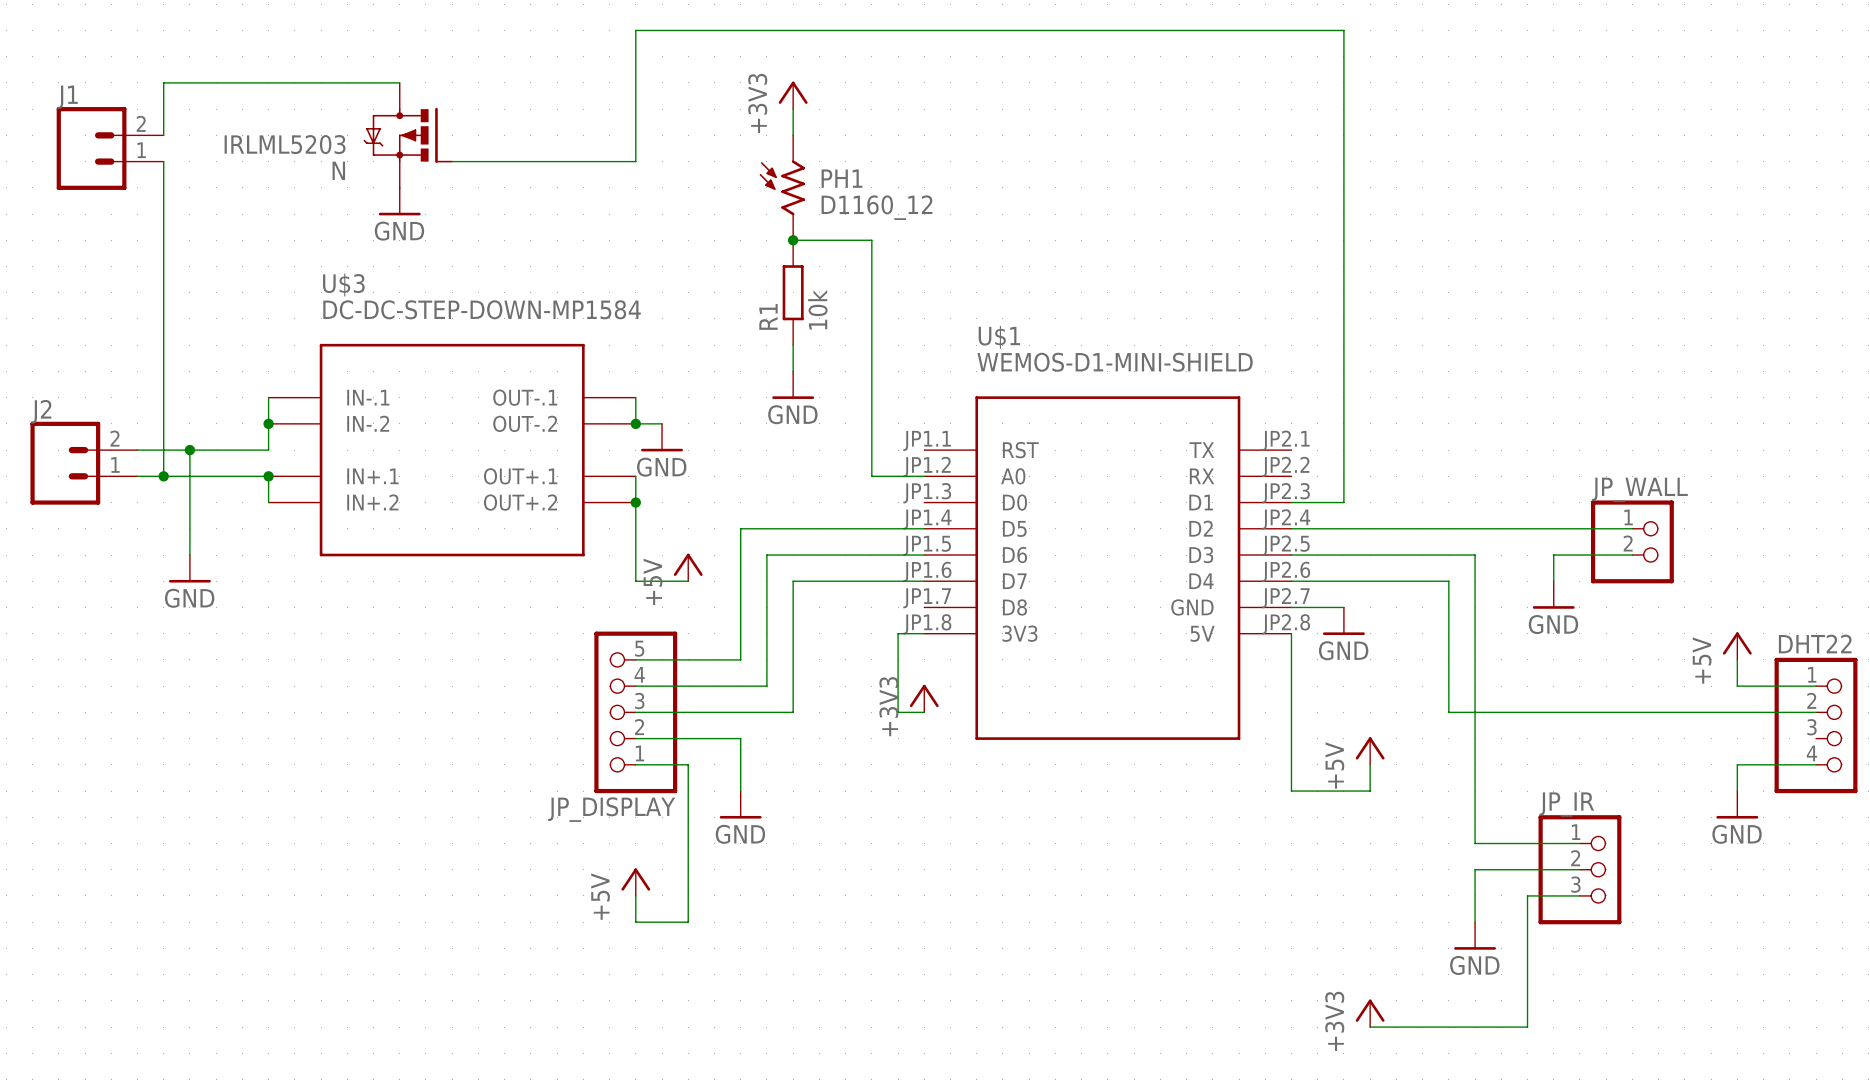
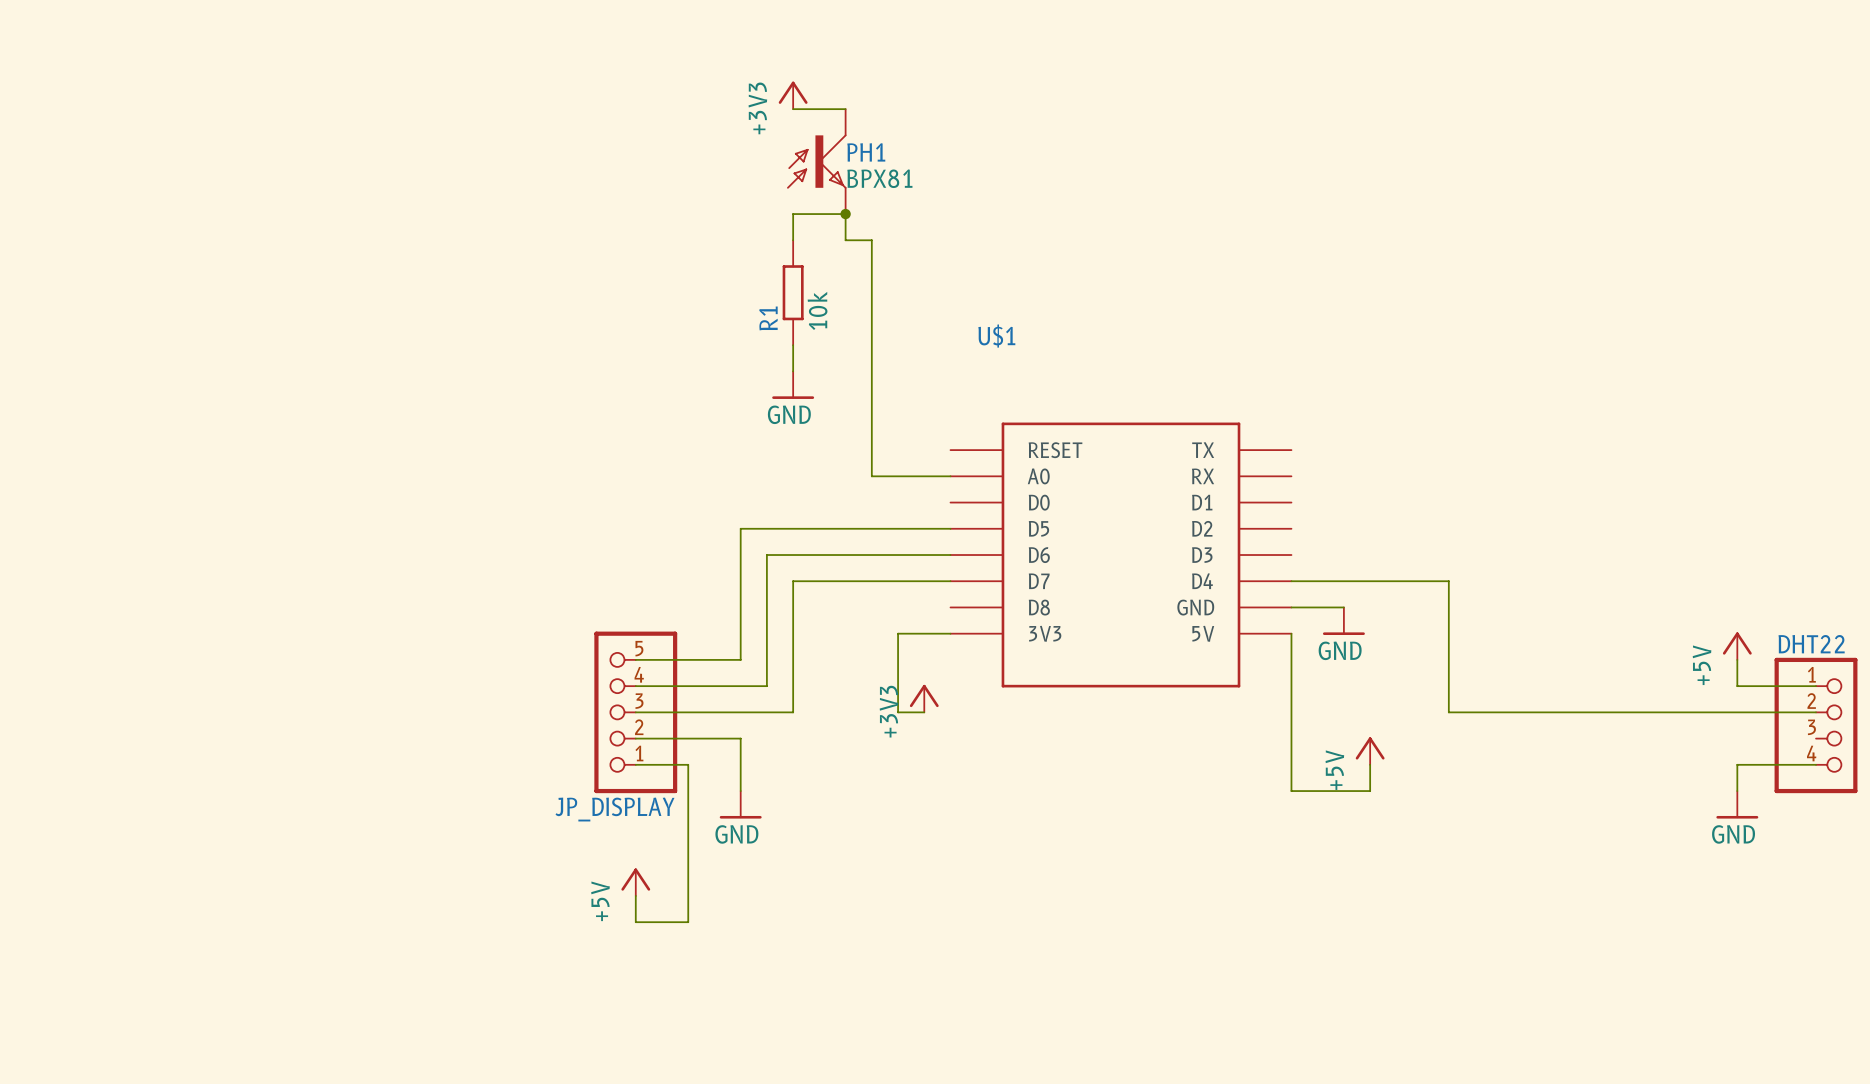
wire: (399, 82) (163, 82) (163, 135) -> none
wire: (793, 109) (793, 135) -> (793, 109) (845, 109)
N: IRLML5203 (408, 135) -> none
PH1 symbol: [759, 135, 805, 241] -> [787, 109, 847, 215]
J1: (110, 148) -> none
wire: (163, 161) (163, 476) -> none
wire: (452, 161) (635, 161) (635, 30) (1343, 30) (1343, 502) (1291, 502) -> none
power symbol: GND (399, 201) -> none
PH1 value: D1160_12 (877, 207) -> BPX81 (879, 178)
wire: (793, 240) (845, 240) -> (793, 240) (793, 214) (845, 214) (845, 240)
junction position: (793, 240) -> (845, 214)
U$1 value: WEMOS-D1-MINI-SHIELD (1115, 362) -> none
U$1 symbol: [924, 396, 1292, 740] -> [950, 422, 1292, 688]
wire: (268, 397) (268, 450) (137, 450) -> none
wire: (635, 397) (635, 423) (662, 423) -> none
junction: (268, 423) -> none
junction: (635, 423) -> none
power symbol: GND (662, 437) -> none
wire: (189, 450) (189, 555) -> none
junction: (189, 450) -> none
U$3: DC-DC-STEP-DOWN-MP1584 (452, 450) -> none
J2: (83, 463) -> none
wire: (137, 476) (268, 476) (268, 502) -> none
junction: (163, 476) -> none
junction: (268, 476) -> none
wire: (635, 476) (635, 581) (688, 581) -> none
junction: (635, 502) -> none
wire: (1291, 528) (1632, 528) -> none
JP_WALL: (1632, 541) -> none
wire: (1291, 555) (1475, 555) (1475, 843) (1579, 843) -> none
wire: (1632, 555) (1553, 555) (1553, 581) -> none
power symbol: +5V (688, 567) -> none
power symbol: GND (189, 568) -> none
power symbol: GND (1553, 595) -> none
wire: (1579, 869) (1475, 869) (1475, 922) -> none
JP_IR: (1579, 869) -> none
wire: (1579, 895) (1527, 895) (1527, 1027) (1370, 1027) -> none
power symbol: GND (1475, 935) -> none
power symbol: +3V3 (1370, 1013) -> none

